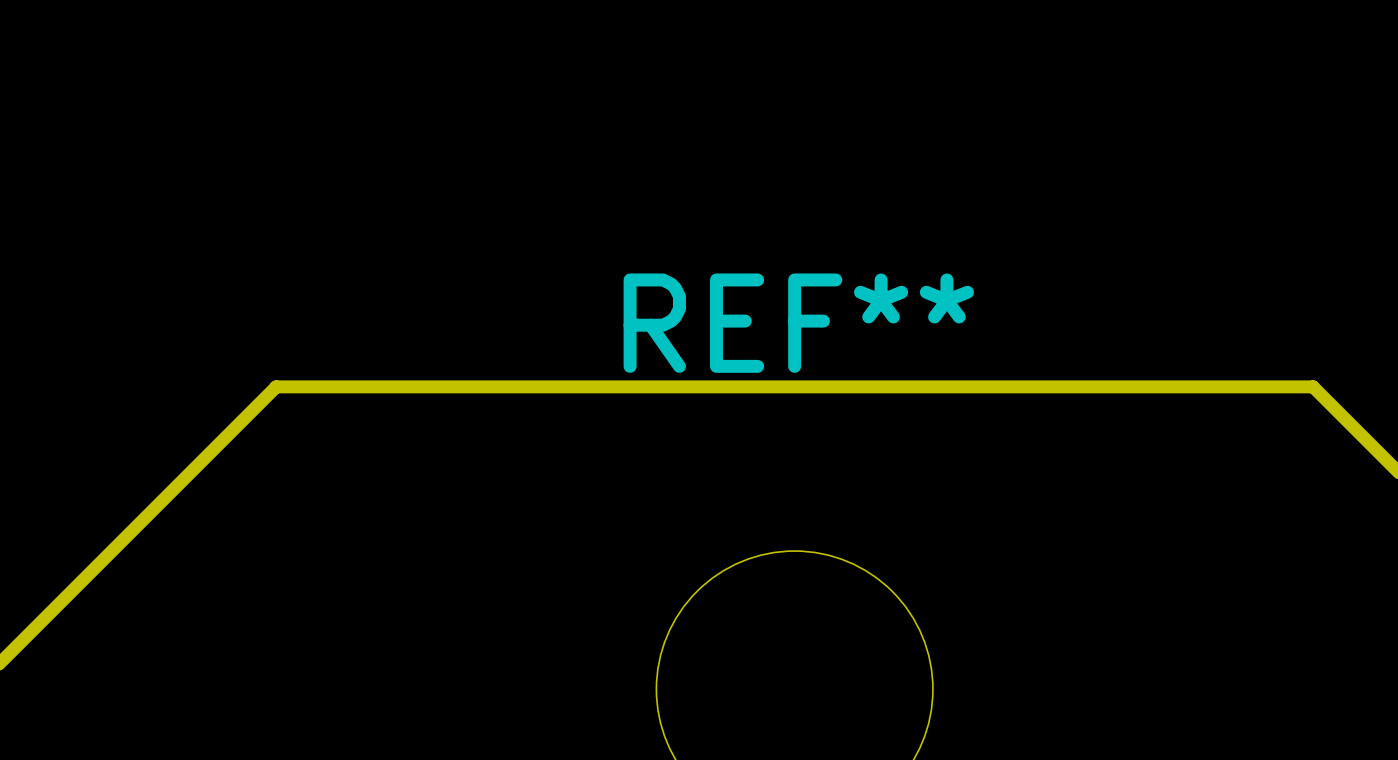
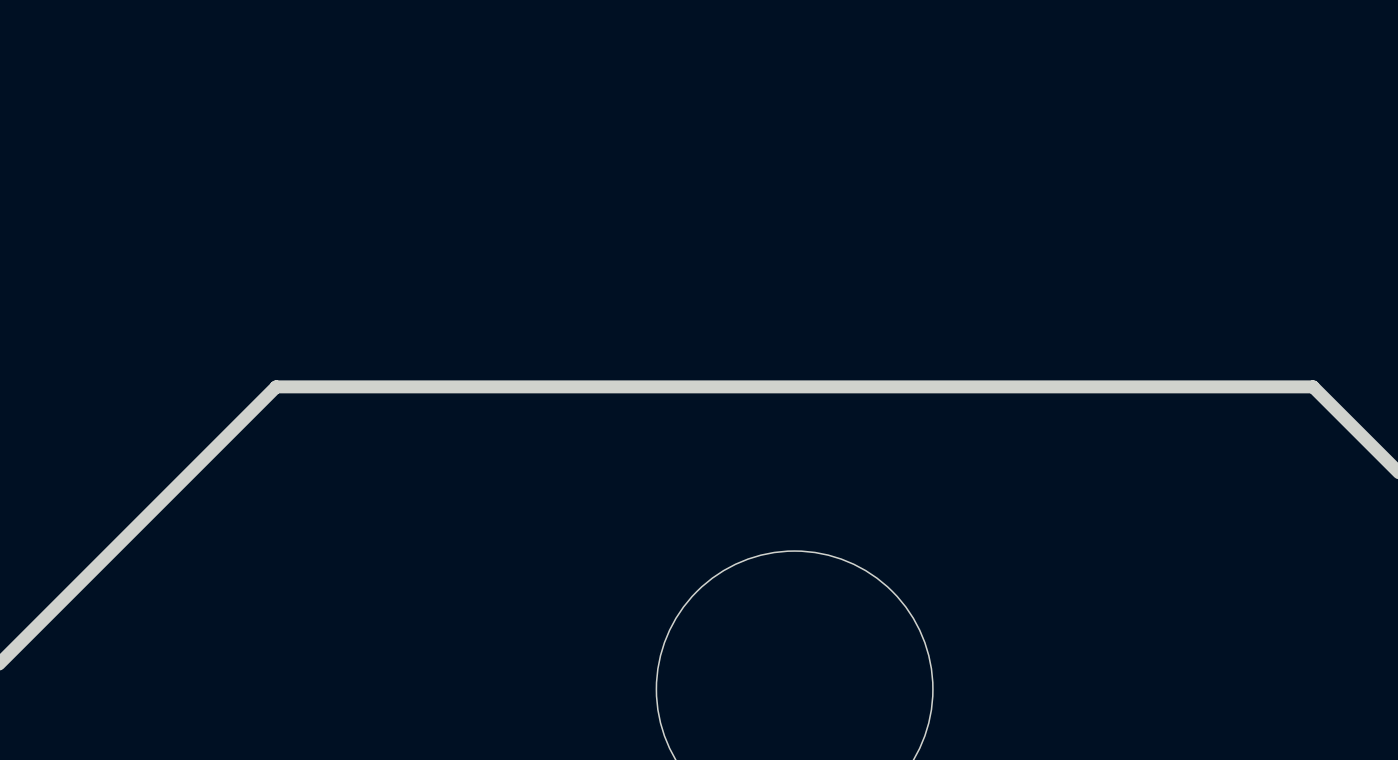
REF** name: REF** (798, 323) -> none

